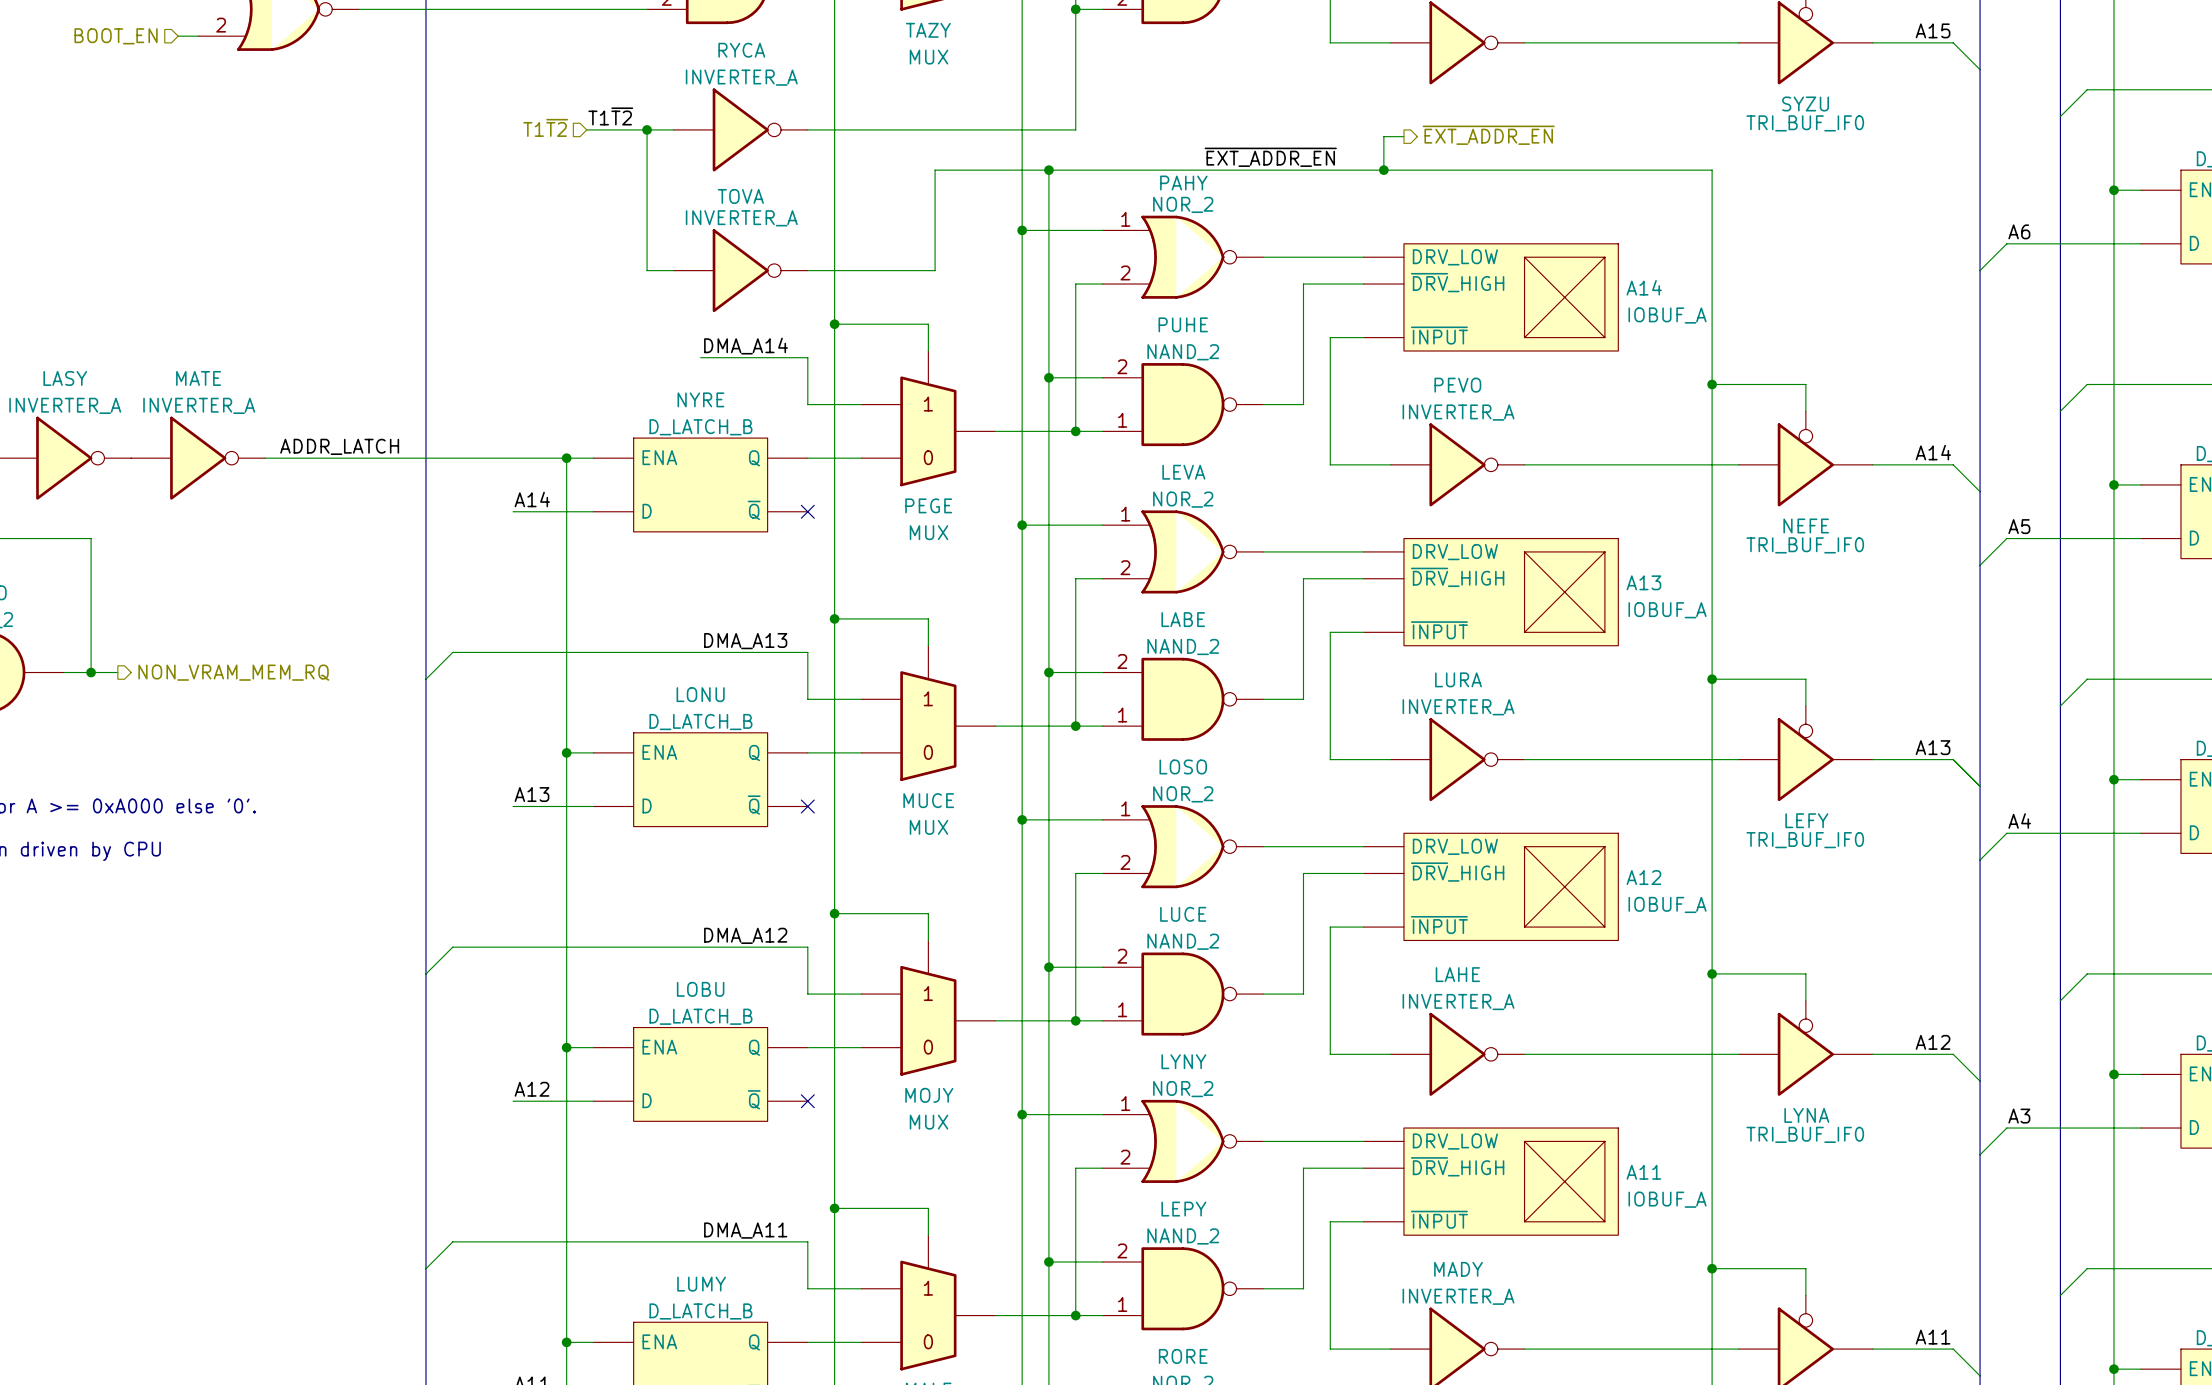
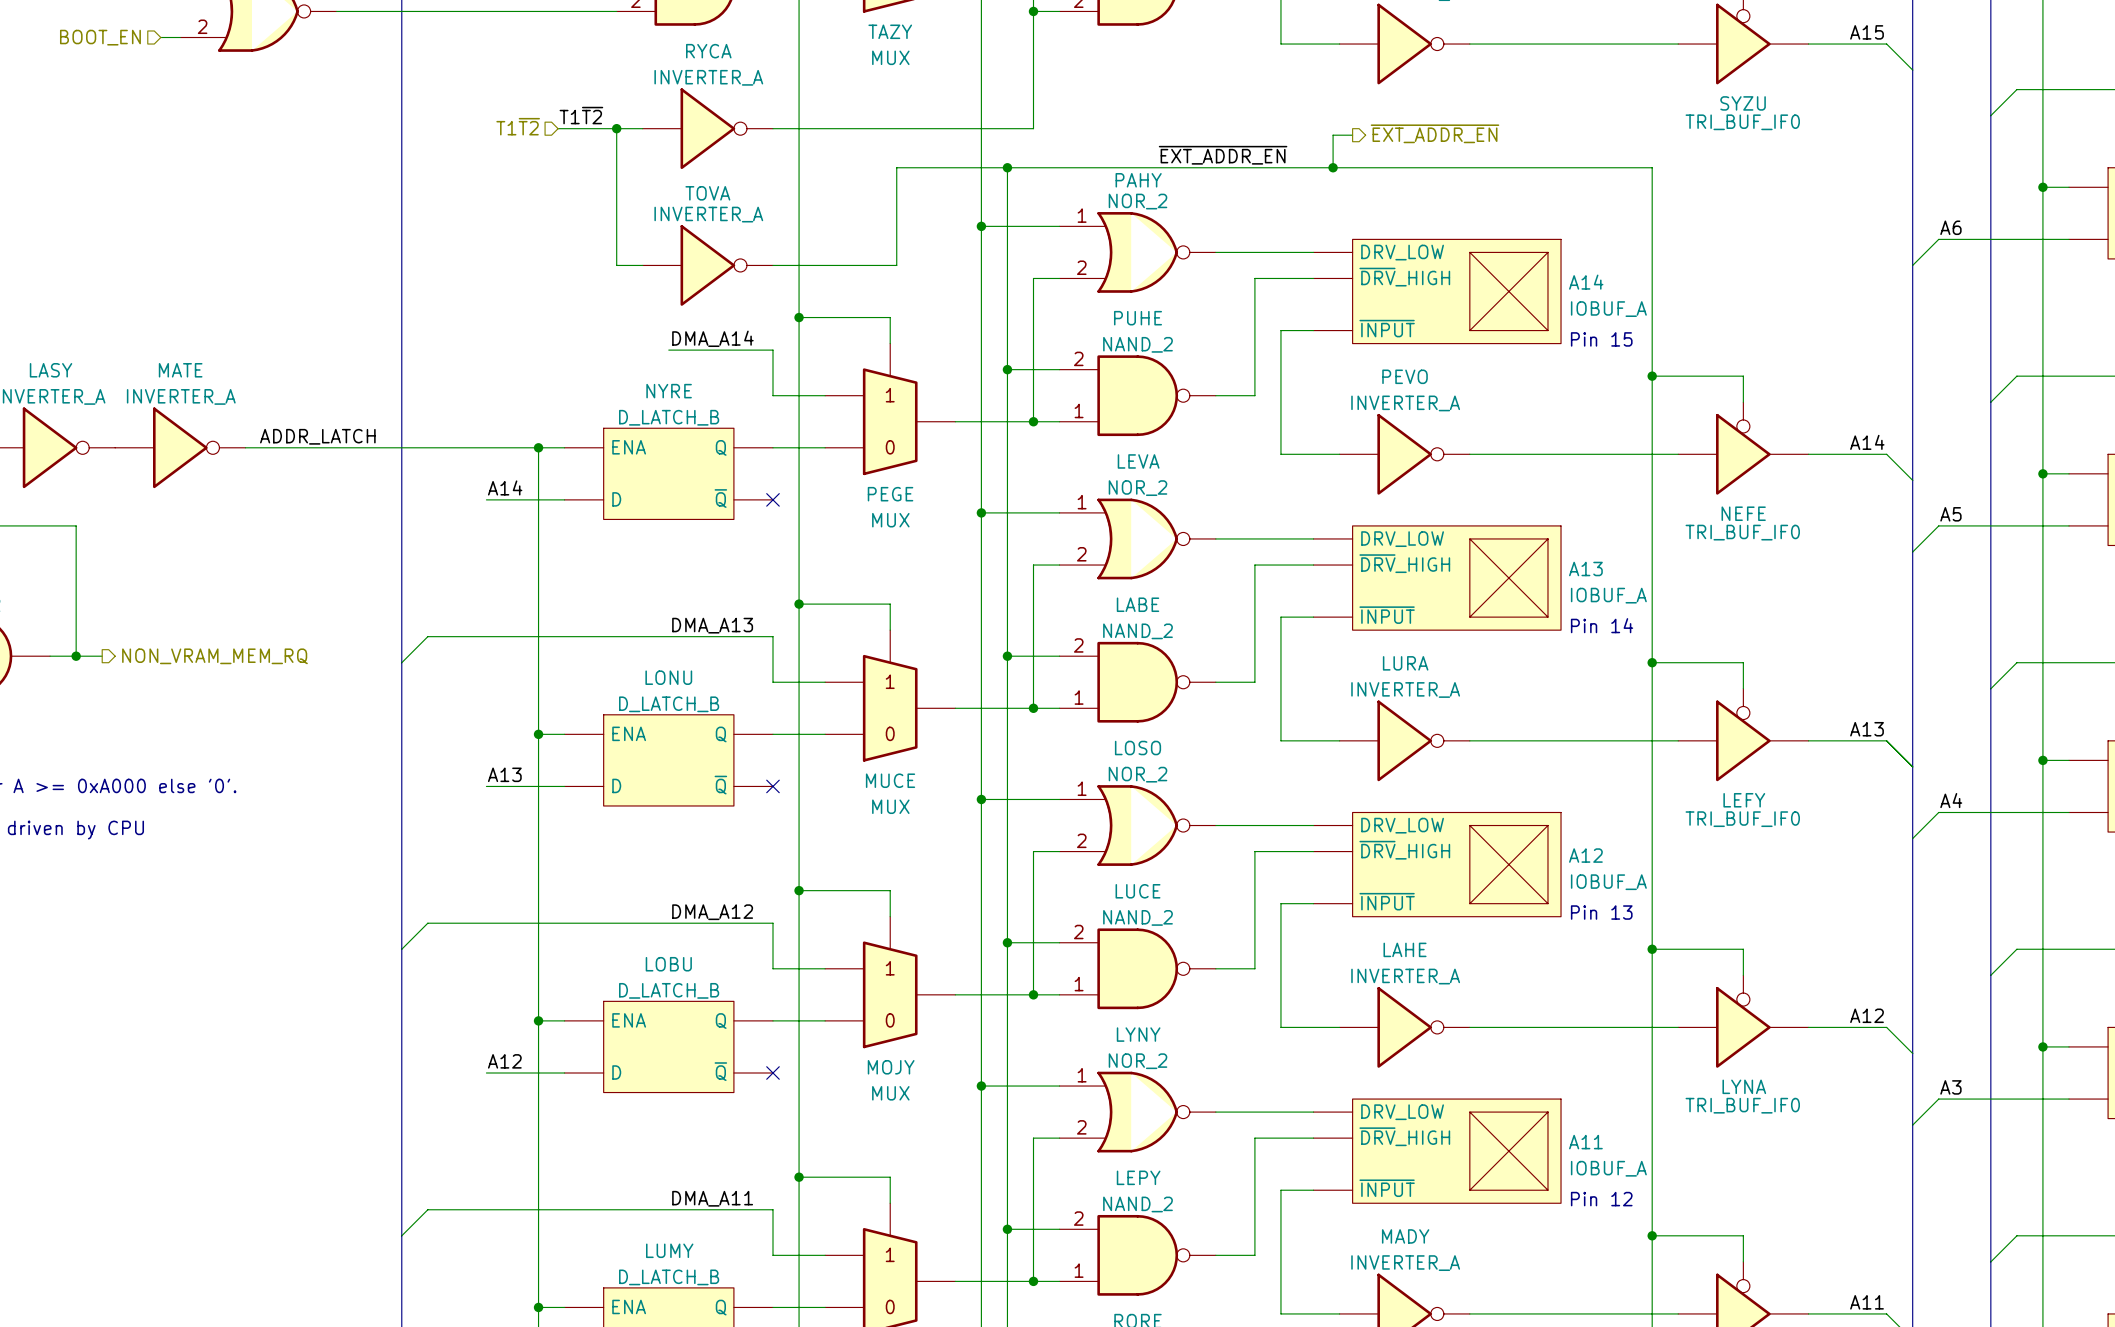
text: none -> Pin 15 (1601, 339)
text: none -> Pin 14 (1602, 625)
text: none -> Pin 13 (1601, 912)
text: none -> Pin 12 (1601, 1199)

